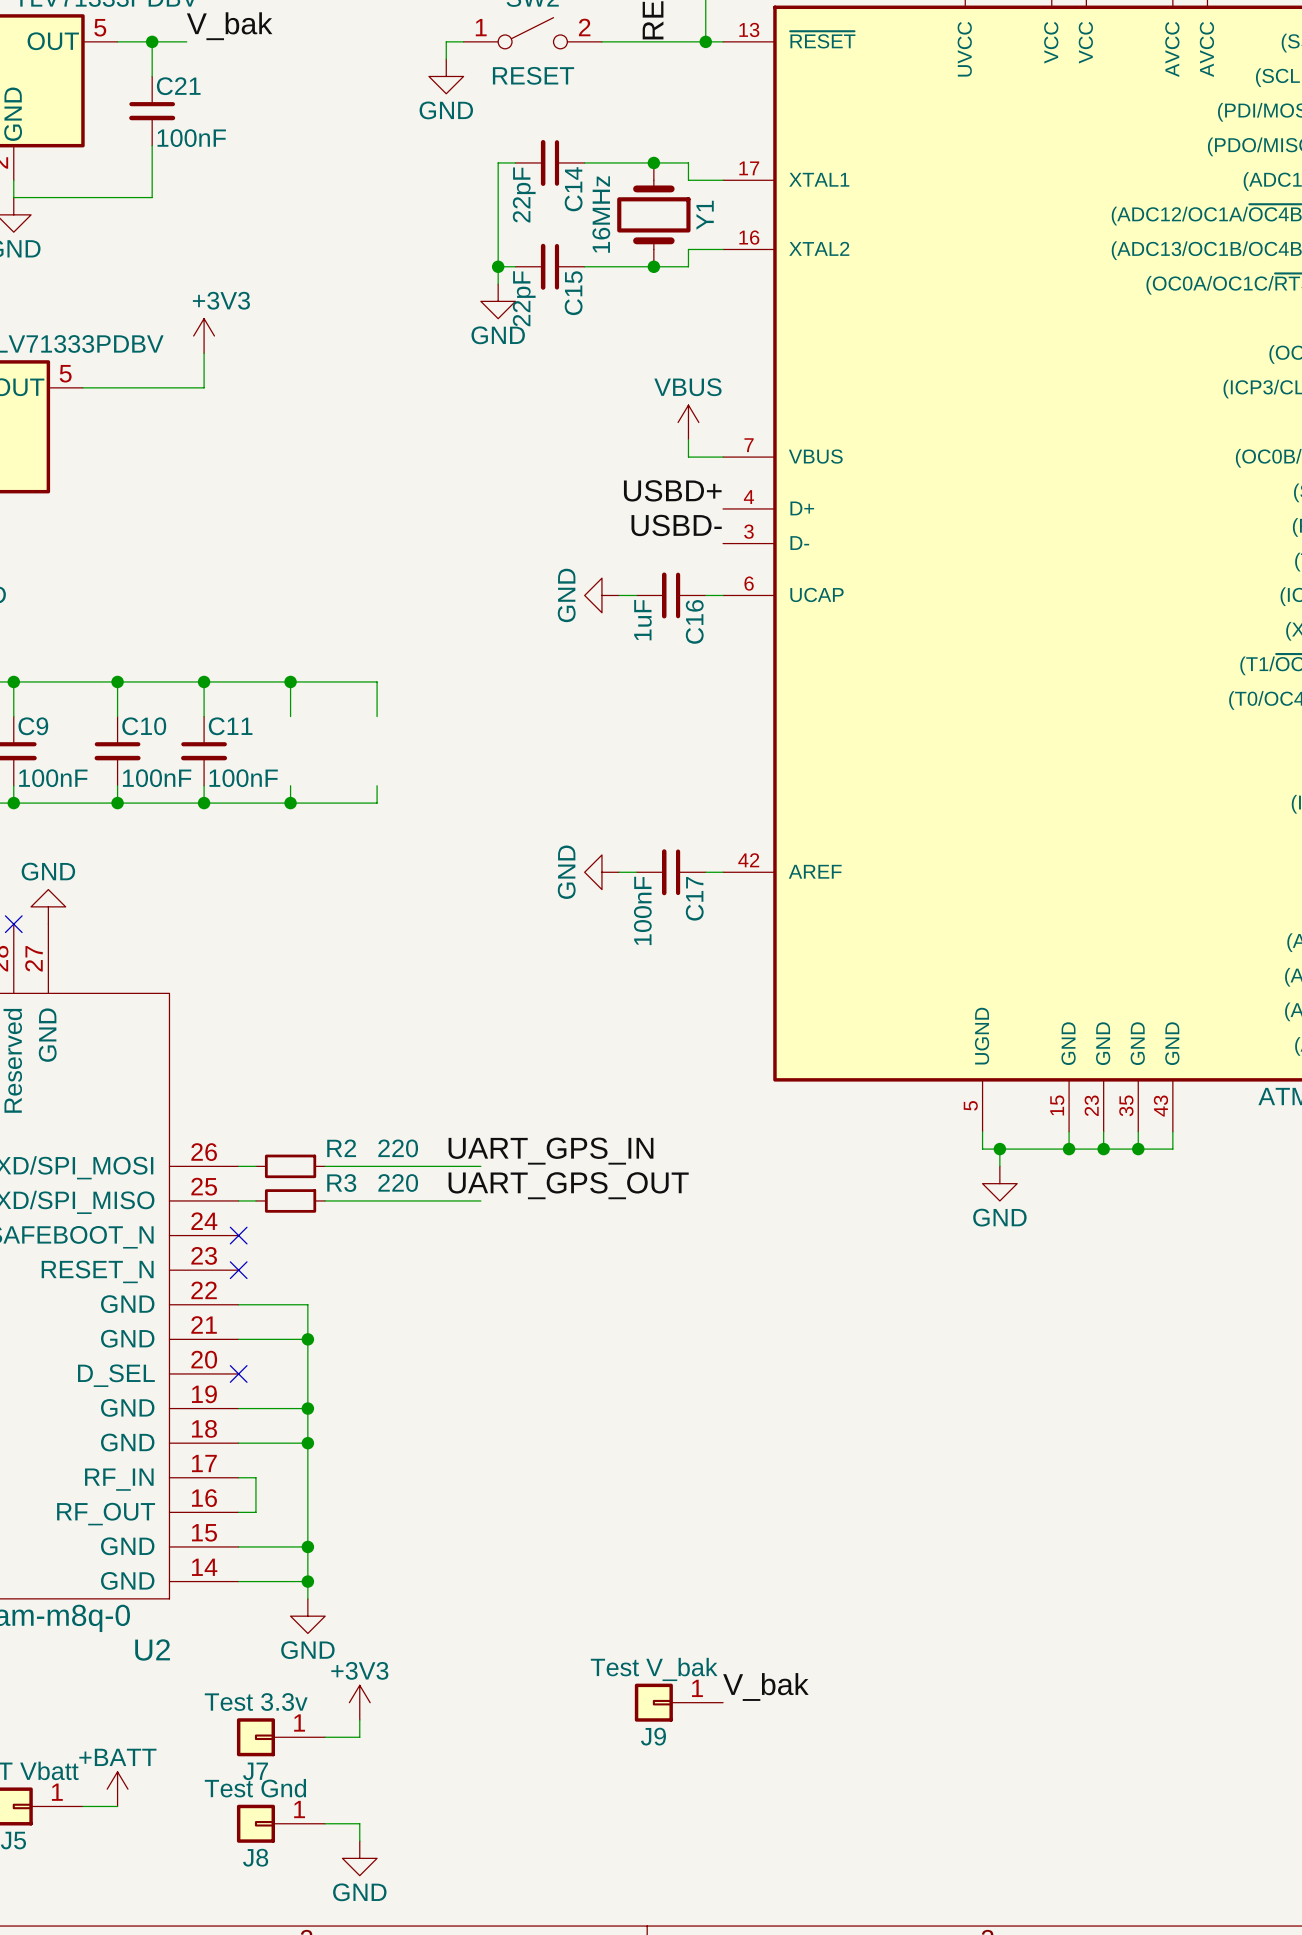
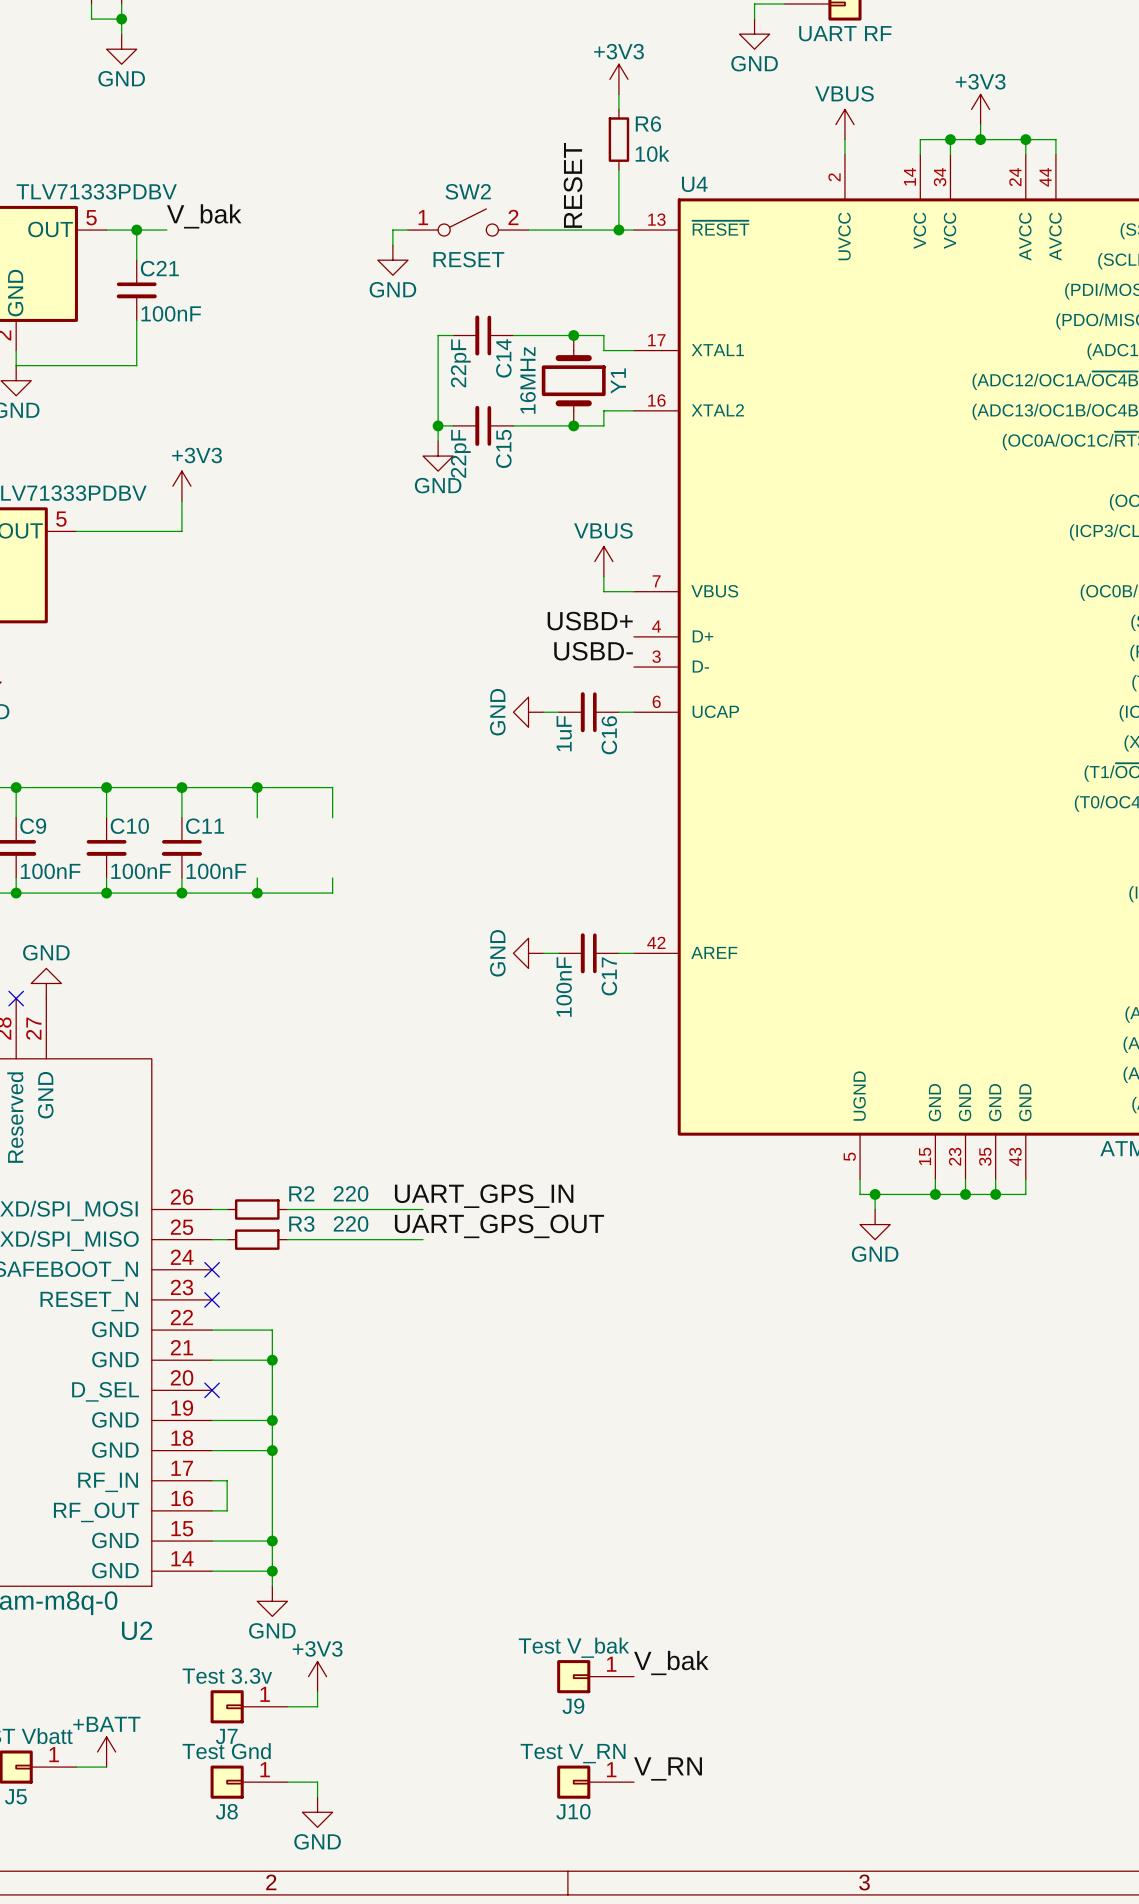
label: none -> V_RN (668, 1768)
J10: none -> Test V_RN (595, 1782)

